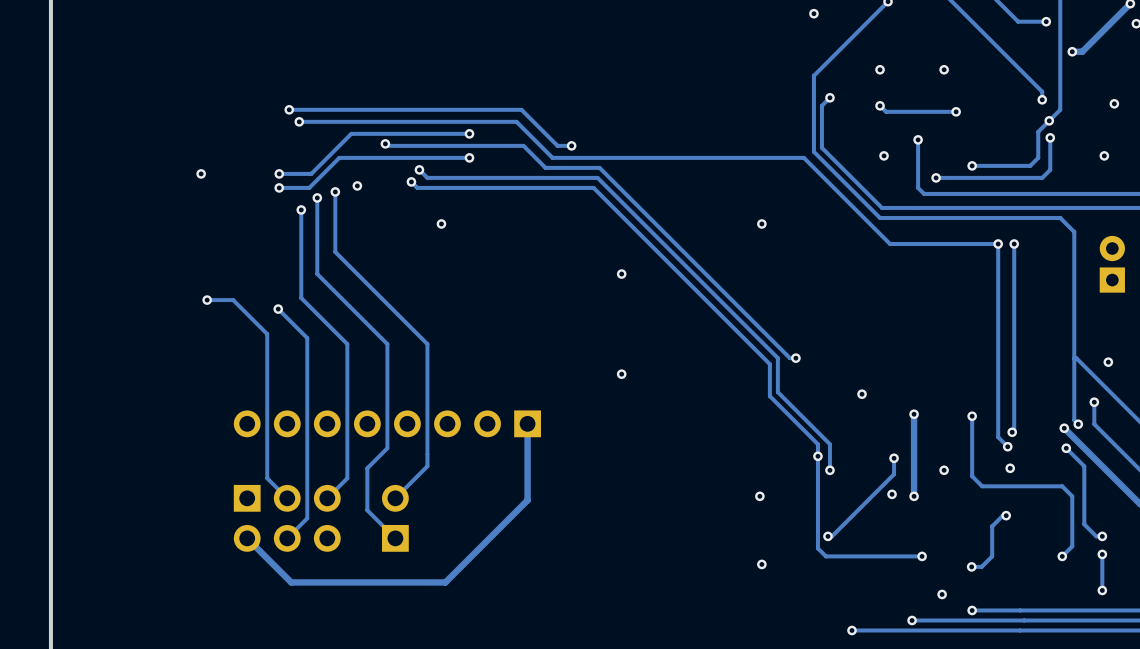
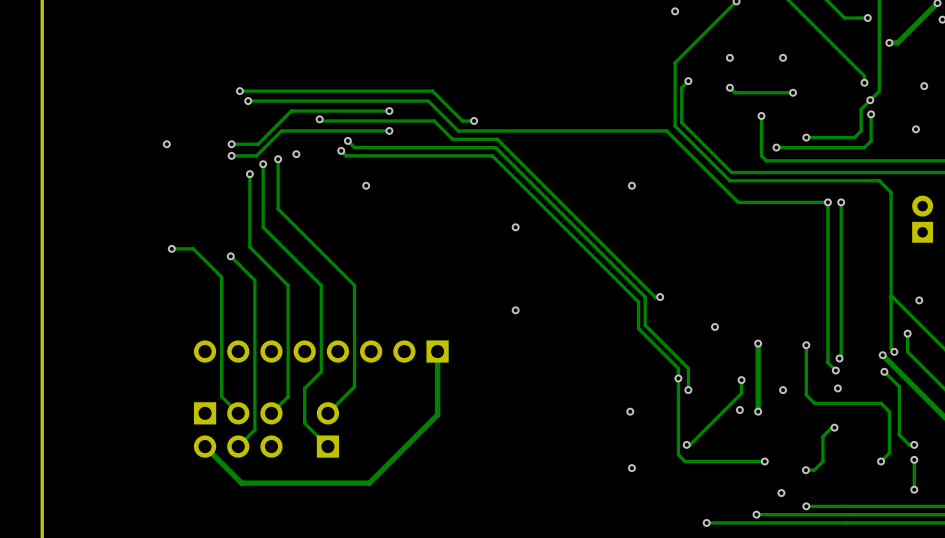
via: (884, 155) -> none

